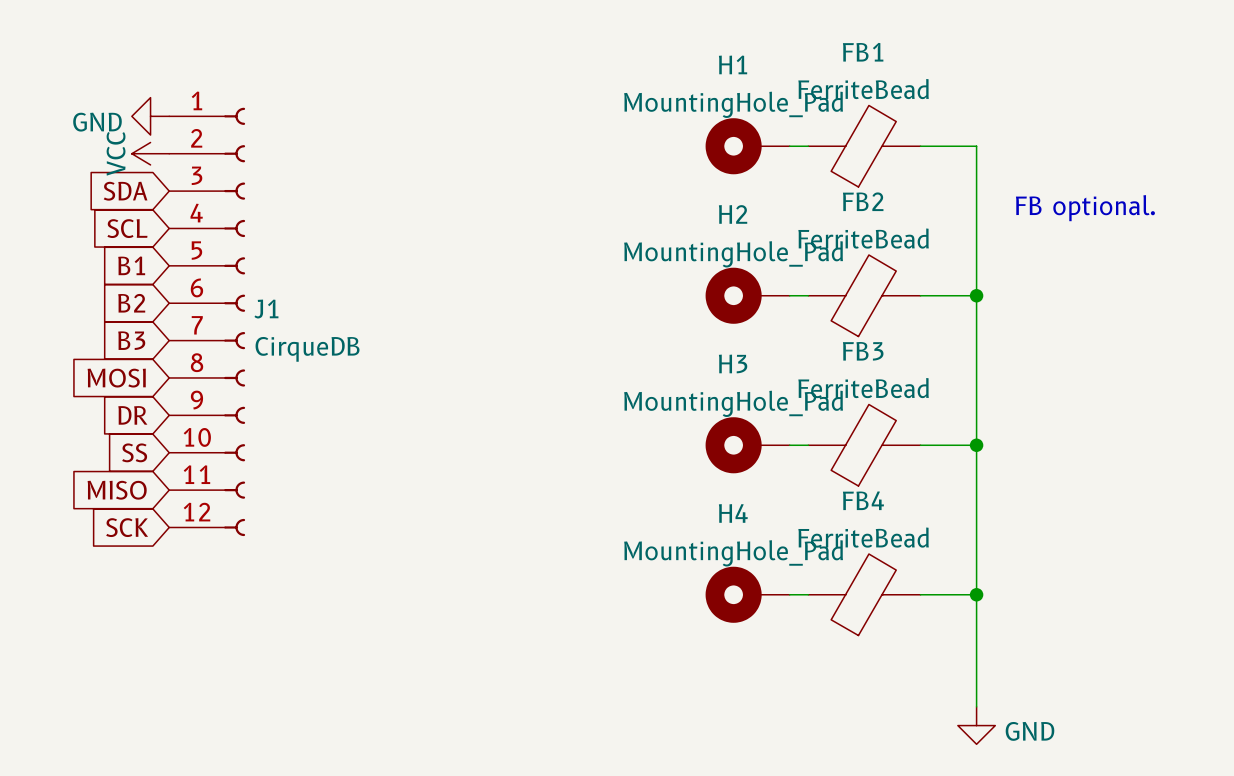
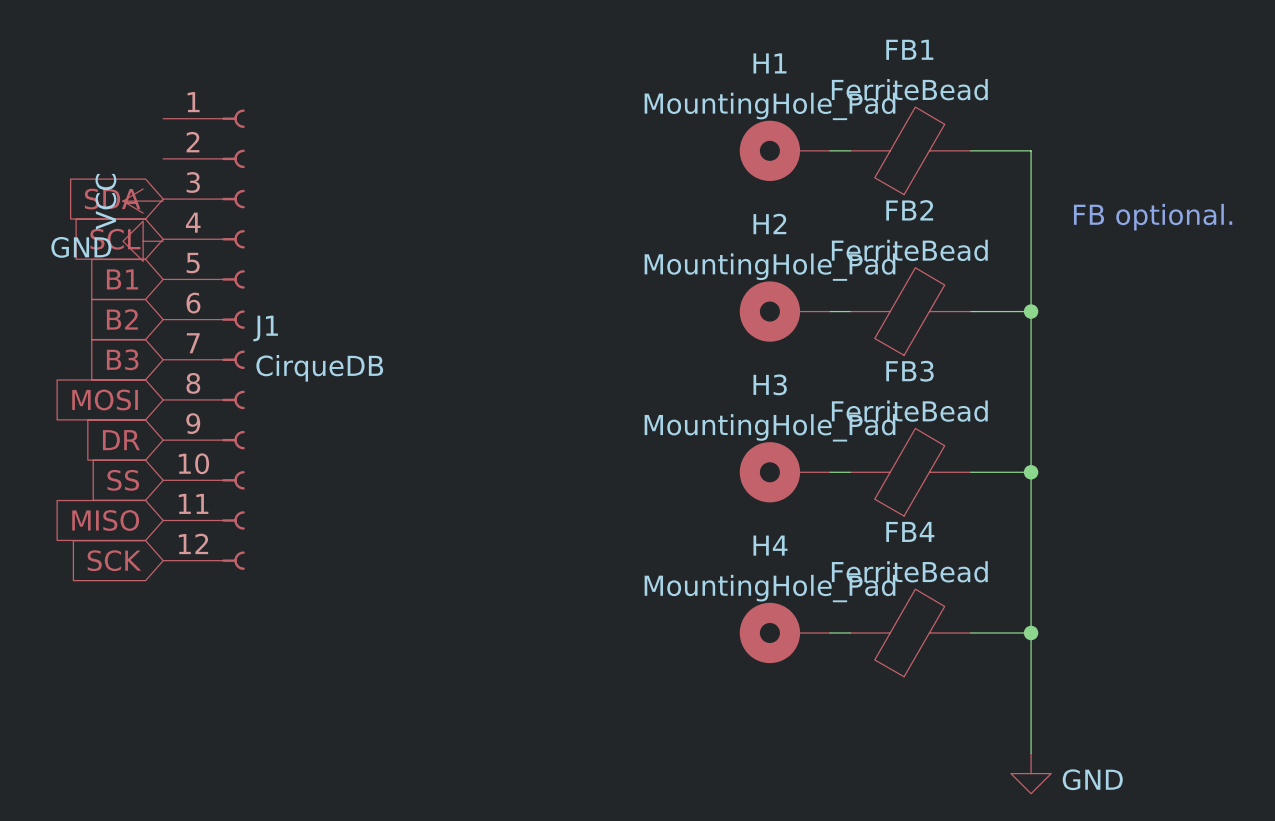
power symbol position: GND (150, 116) -> GND (143, 241)
power symbol position: VCC (150, 153) -> VCC (143, 201)

